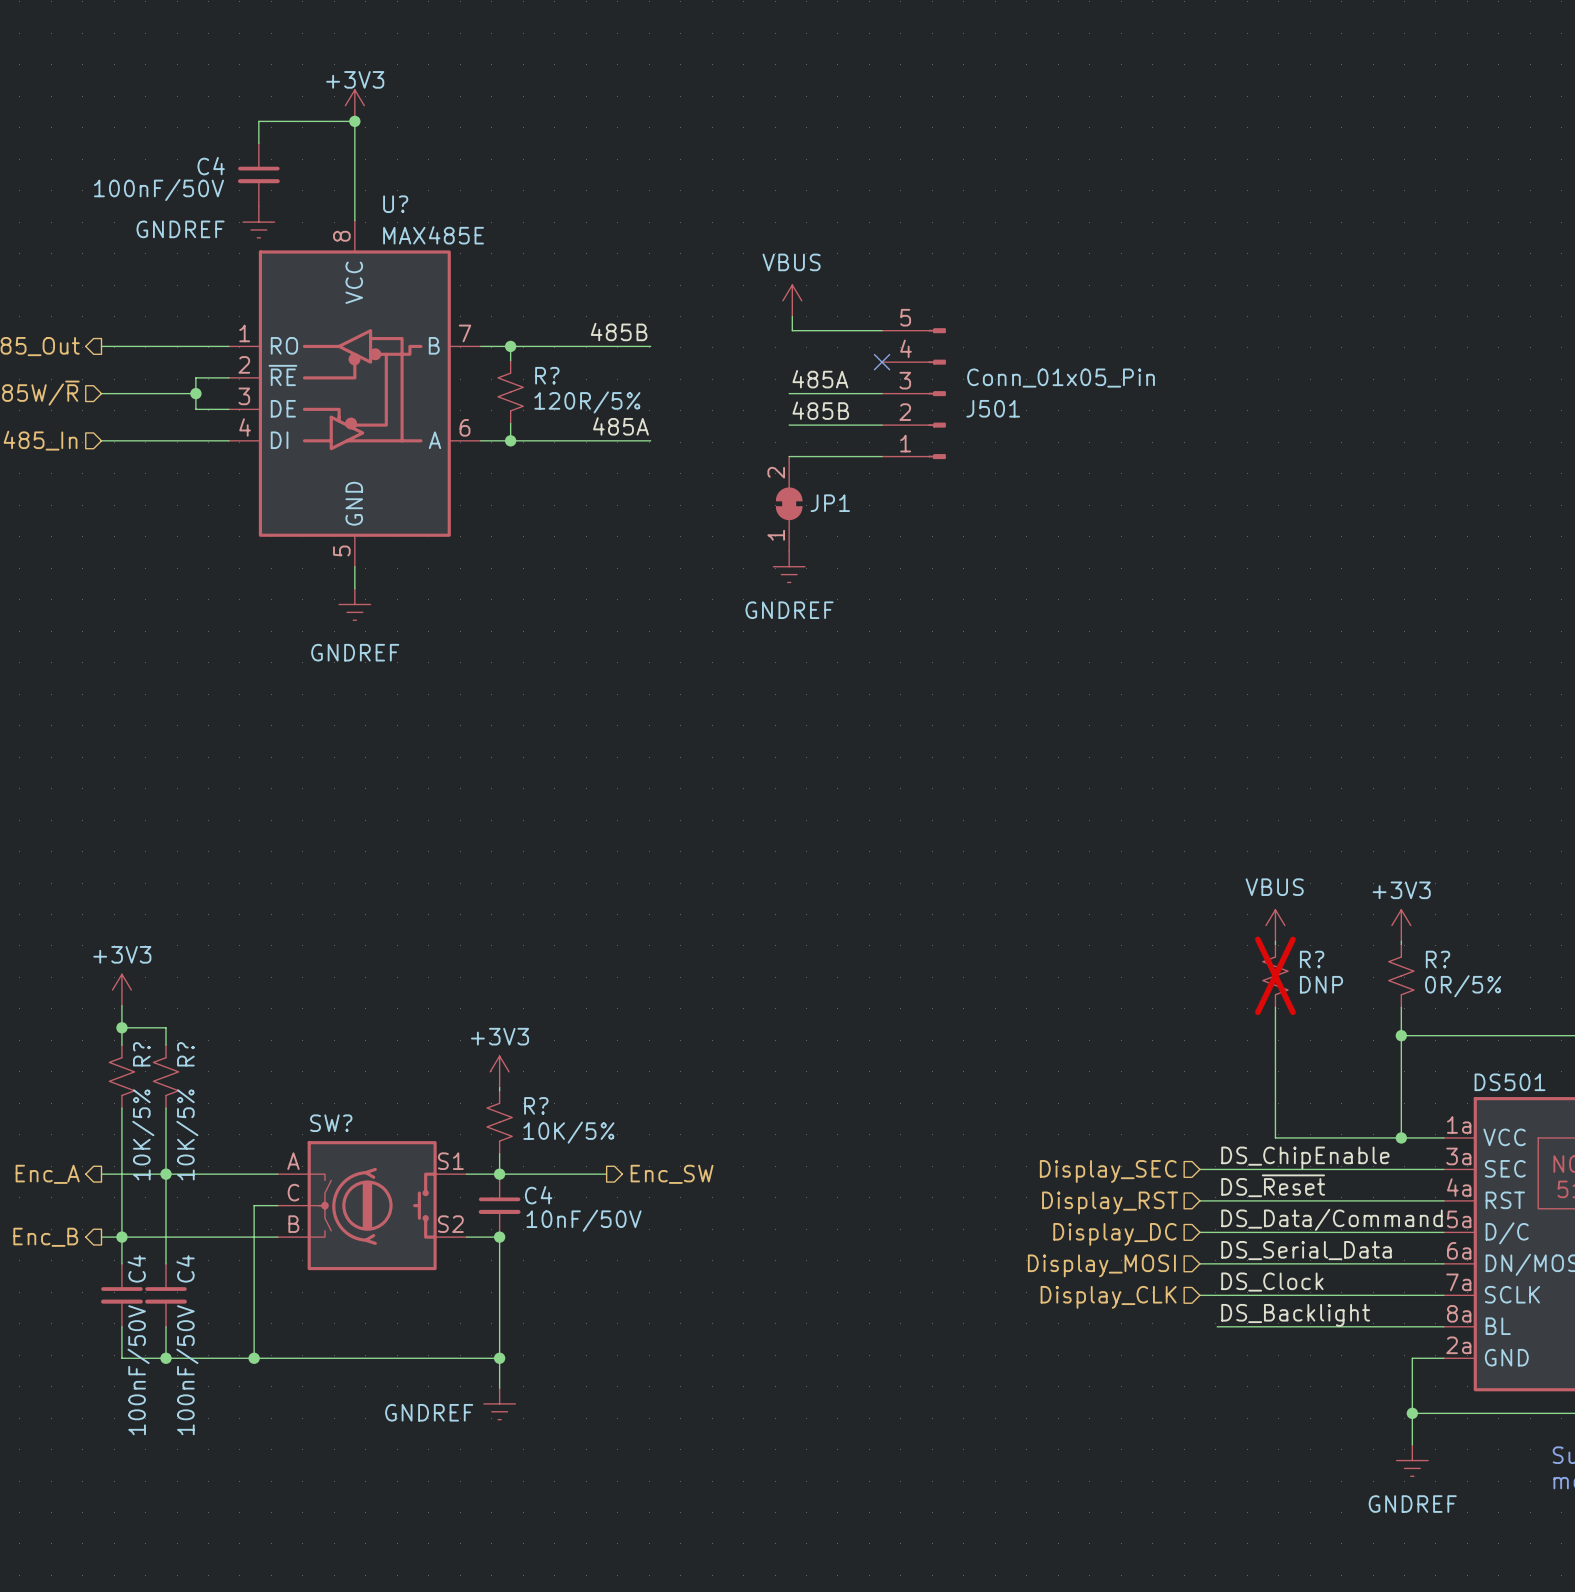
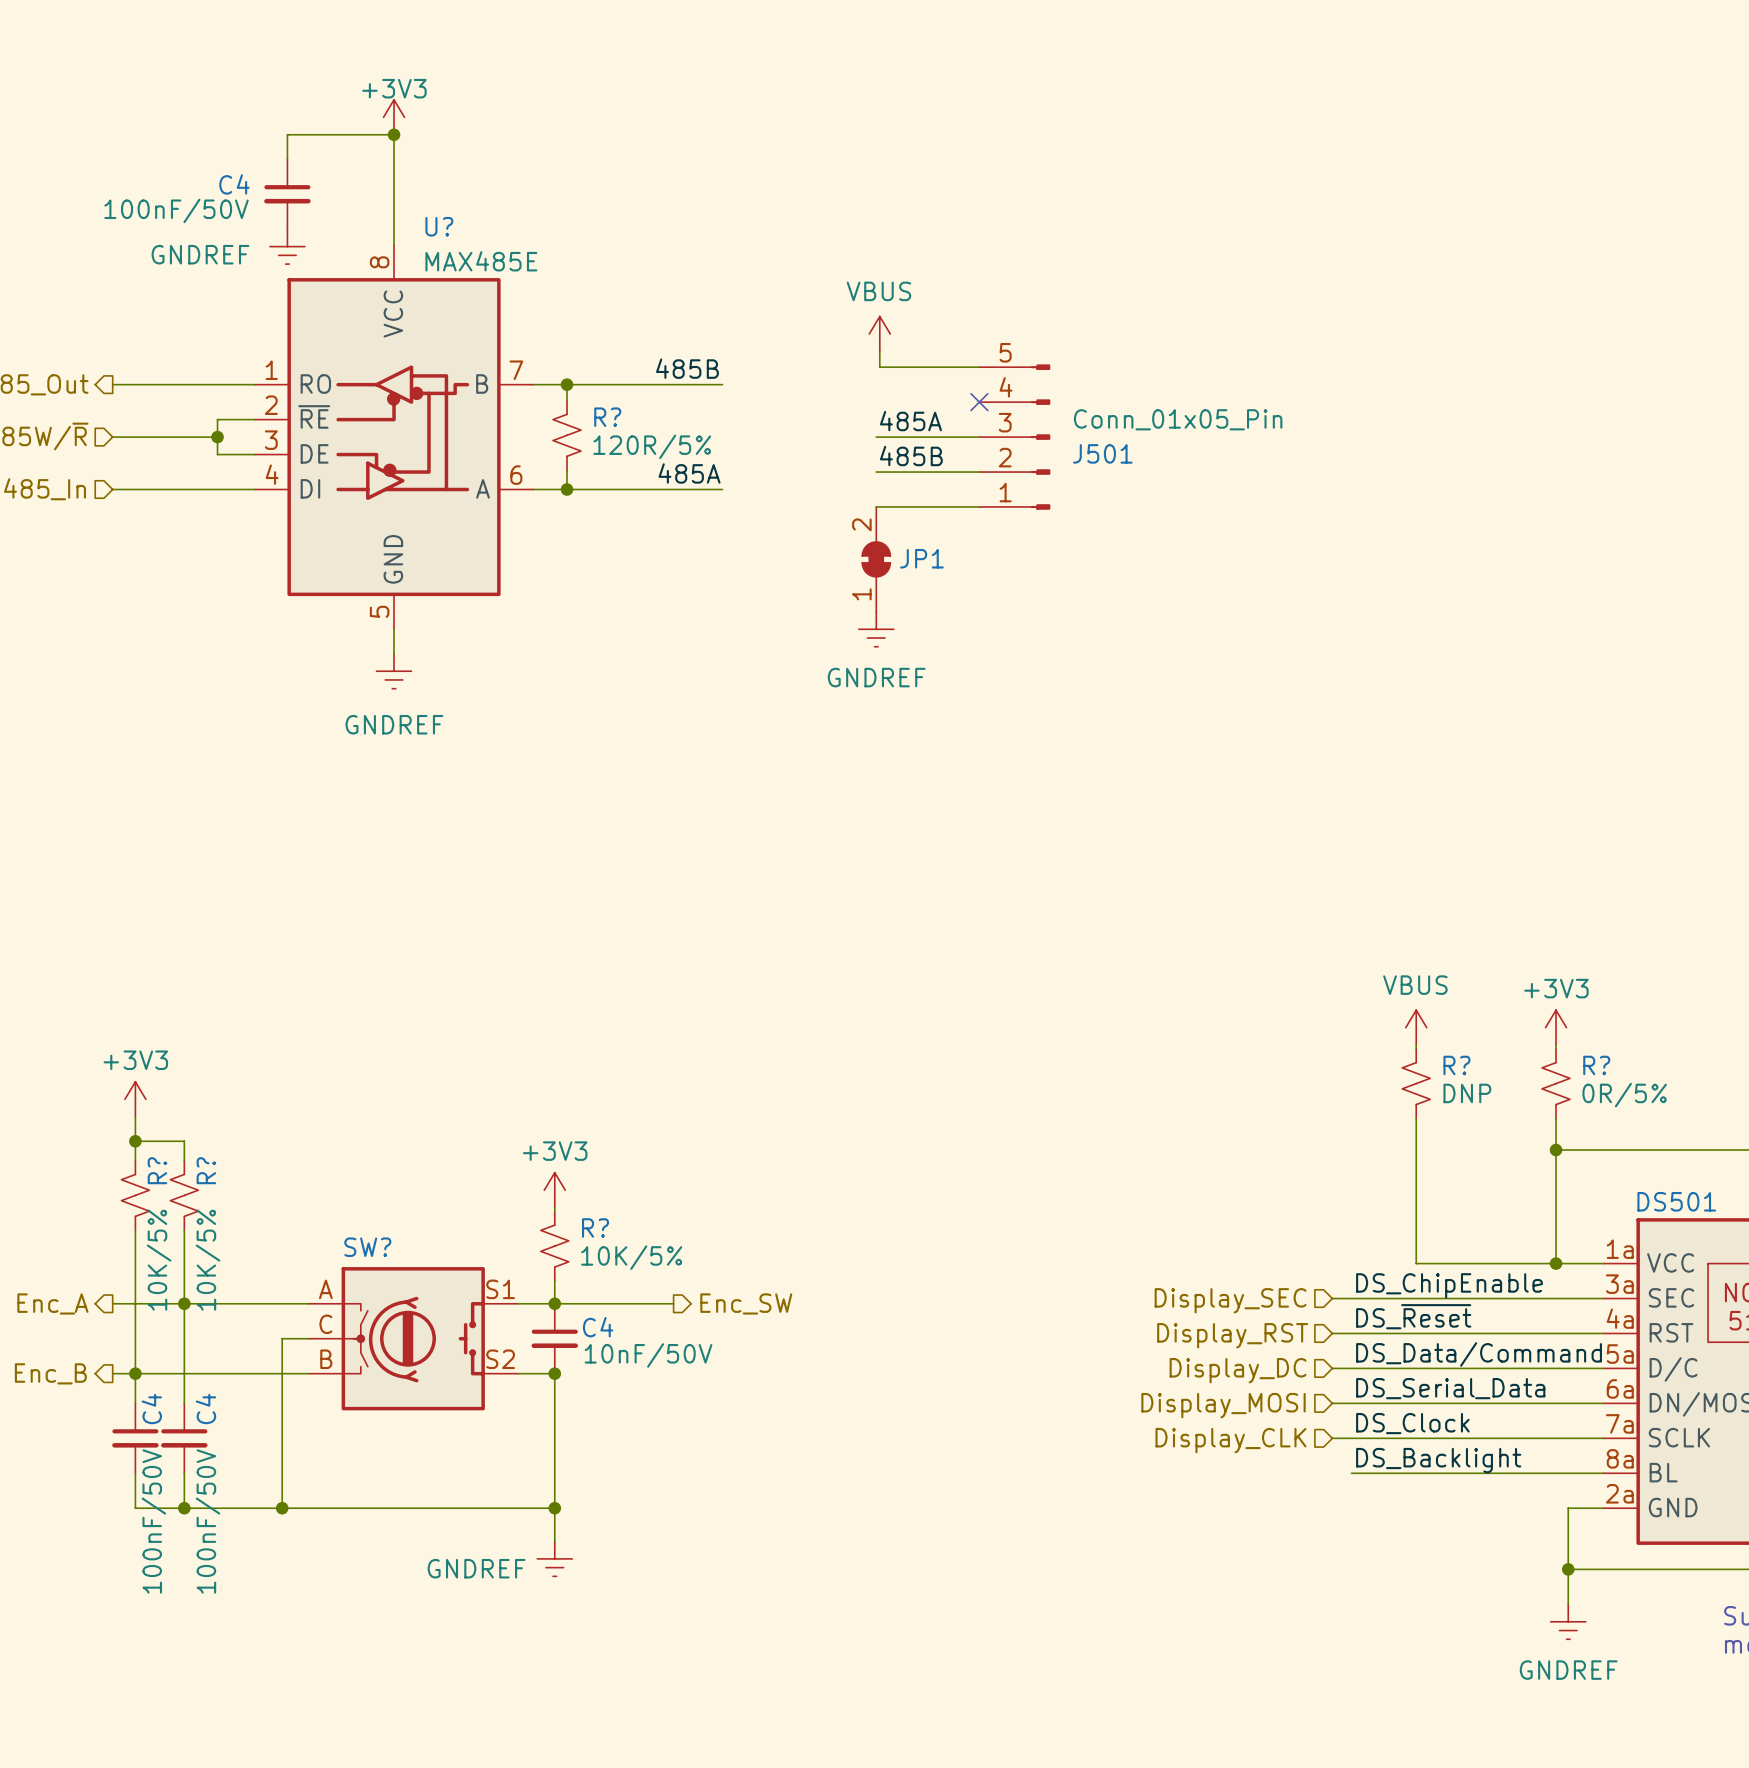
R? do-not-place cross: (1275, 975) -> none

